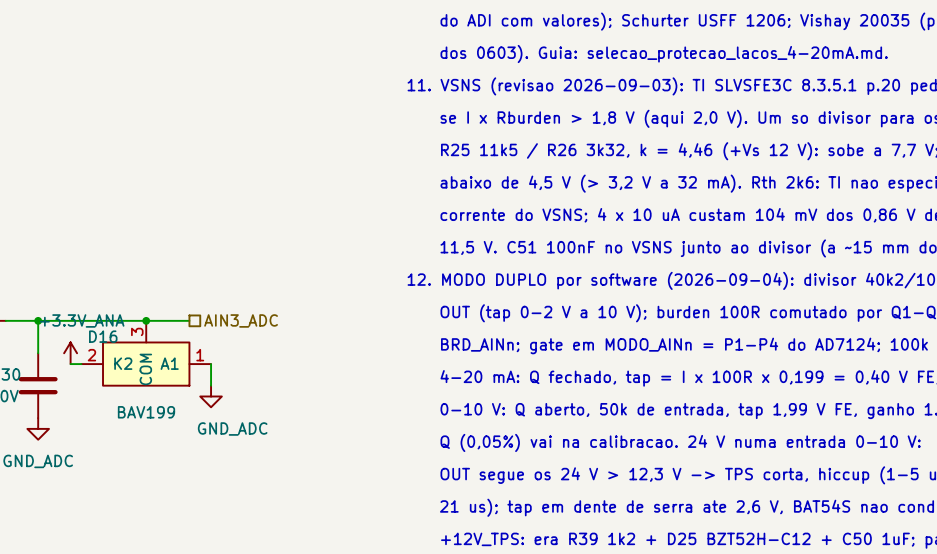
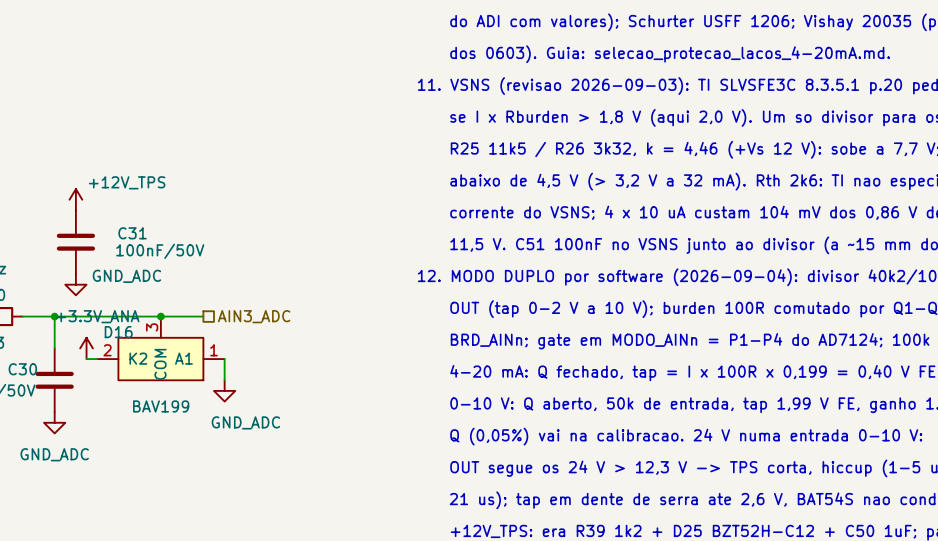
power symbol: none -> +12V_TPS (75, 199)
C31: none -> 100nF/50V (75, 242)
power symbol: none -> GND_ADC (75, 284)

